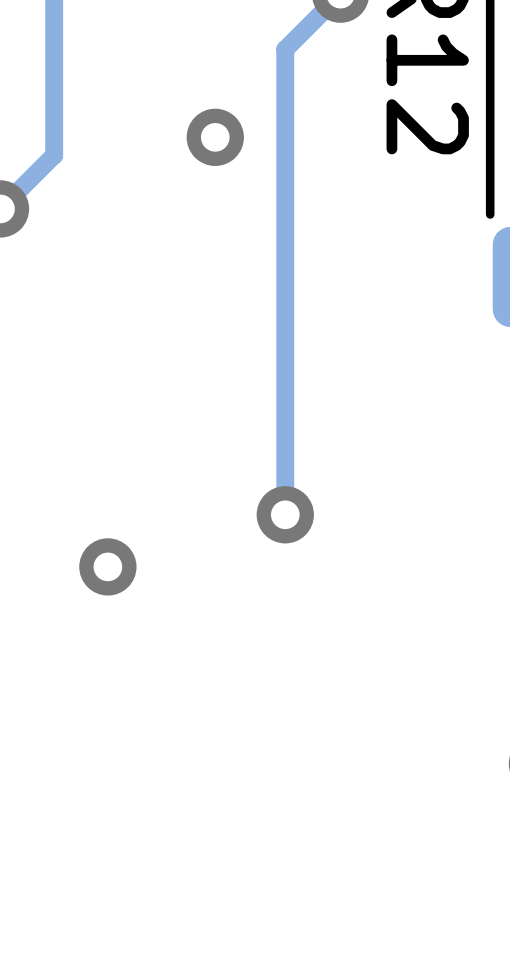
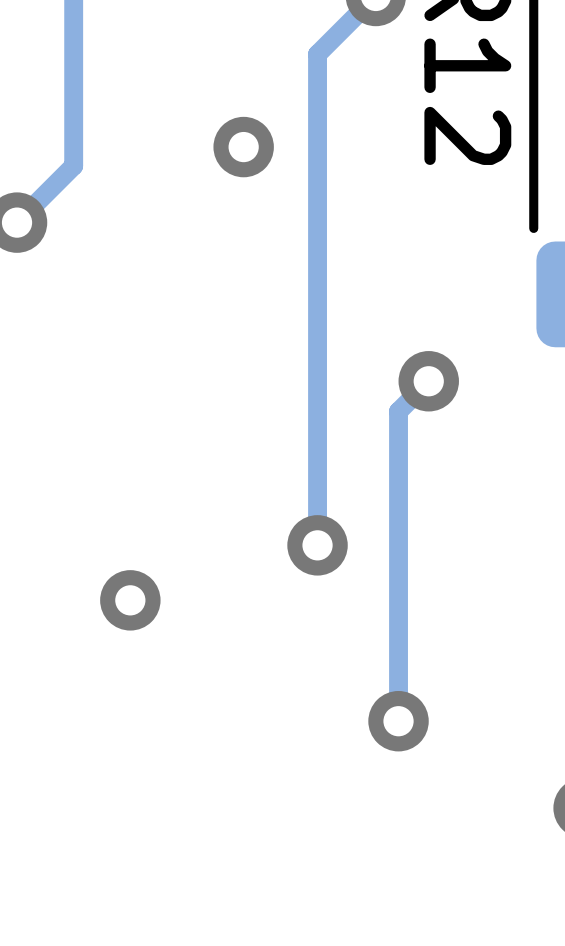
track: none -> (428, 381) (398, 411) (398, 721)
via: none -> (428, 381)
via: none -> (398, 721)

